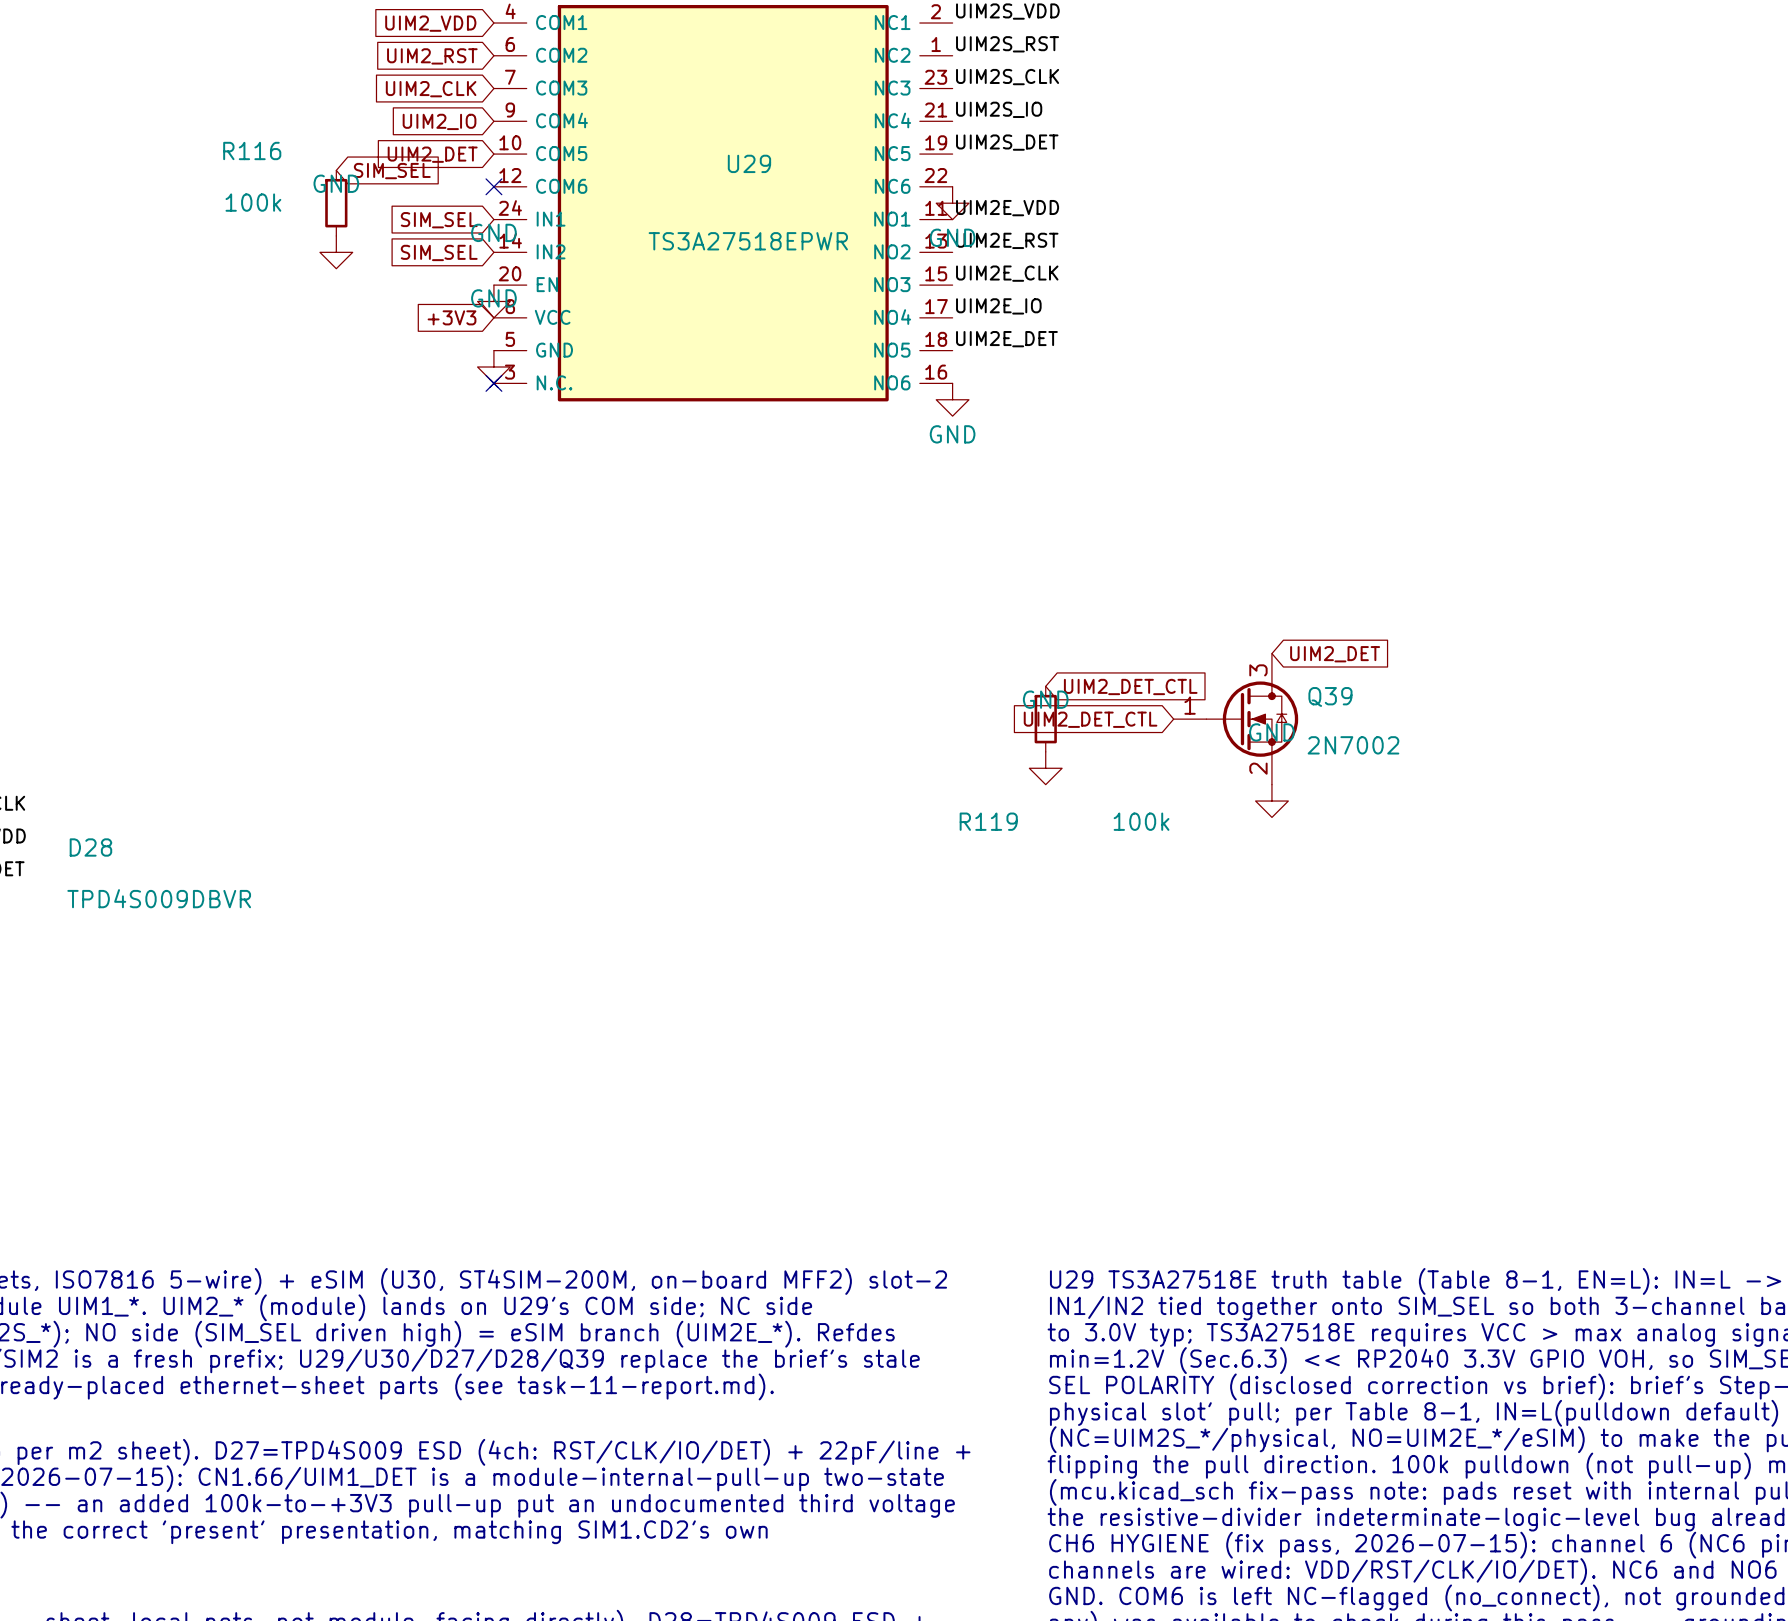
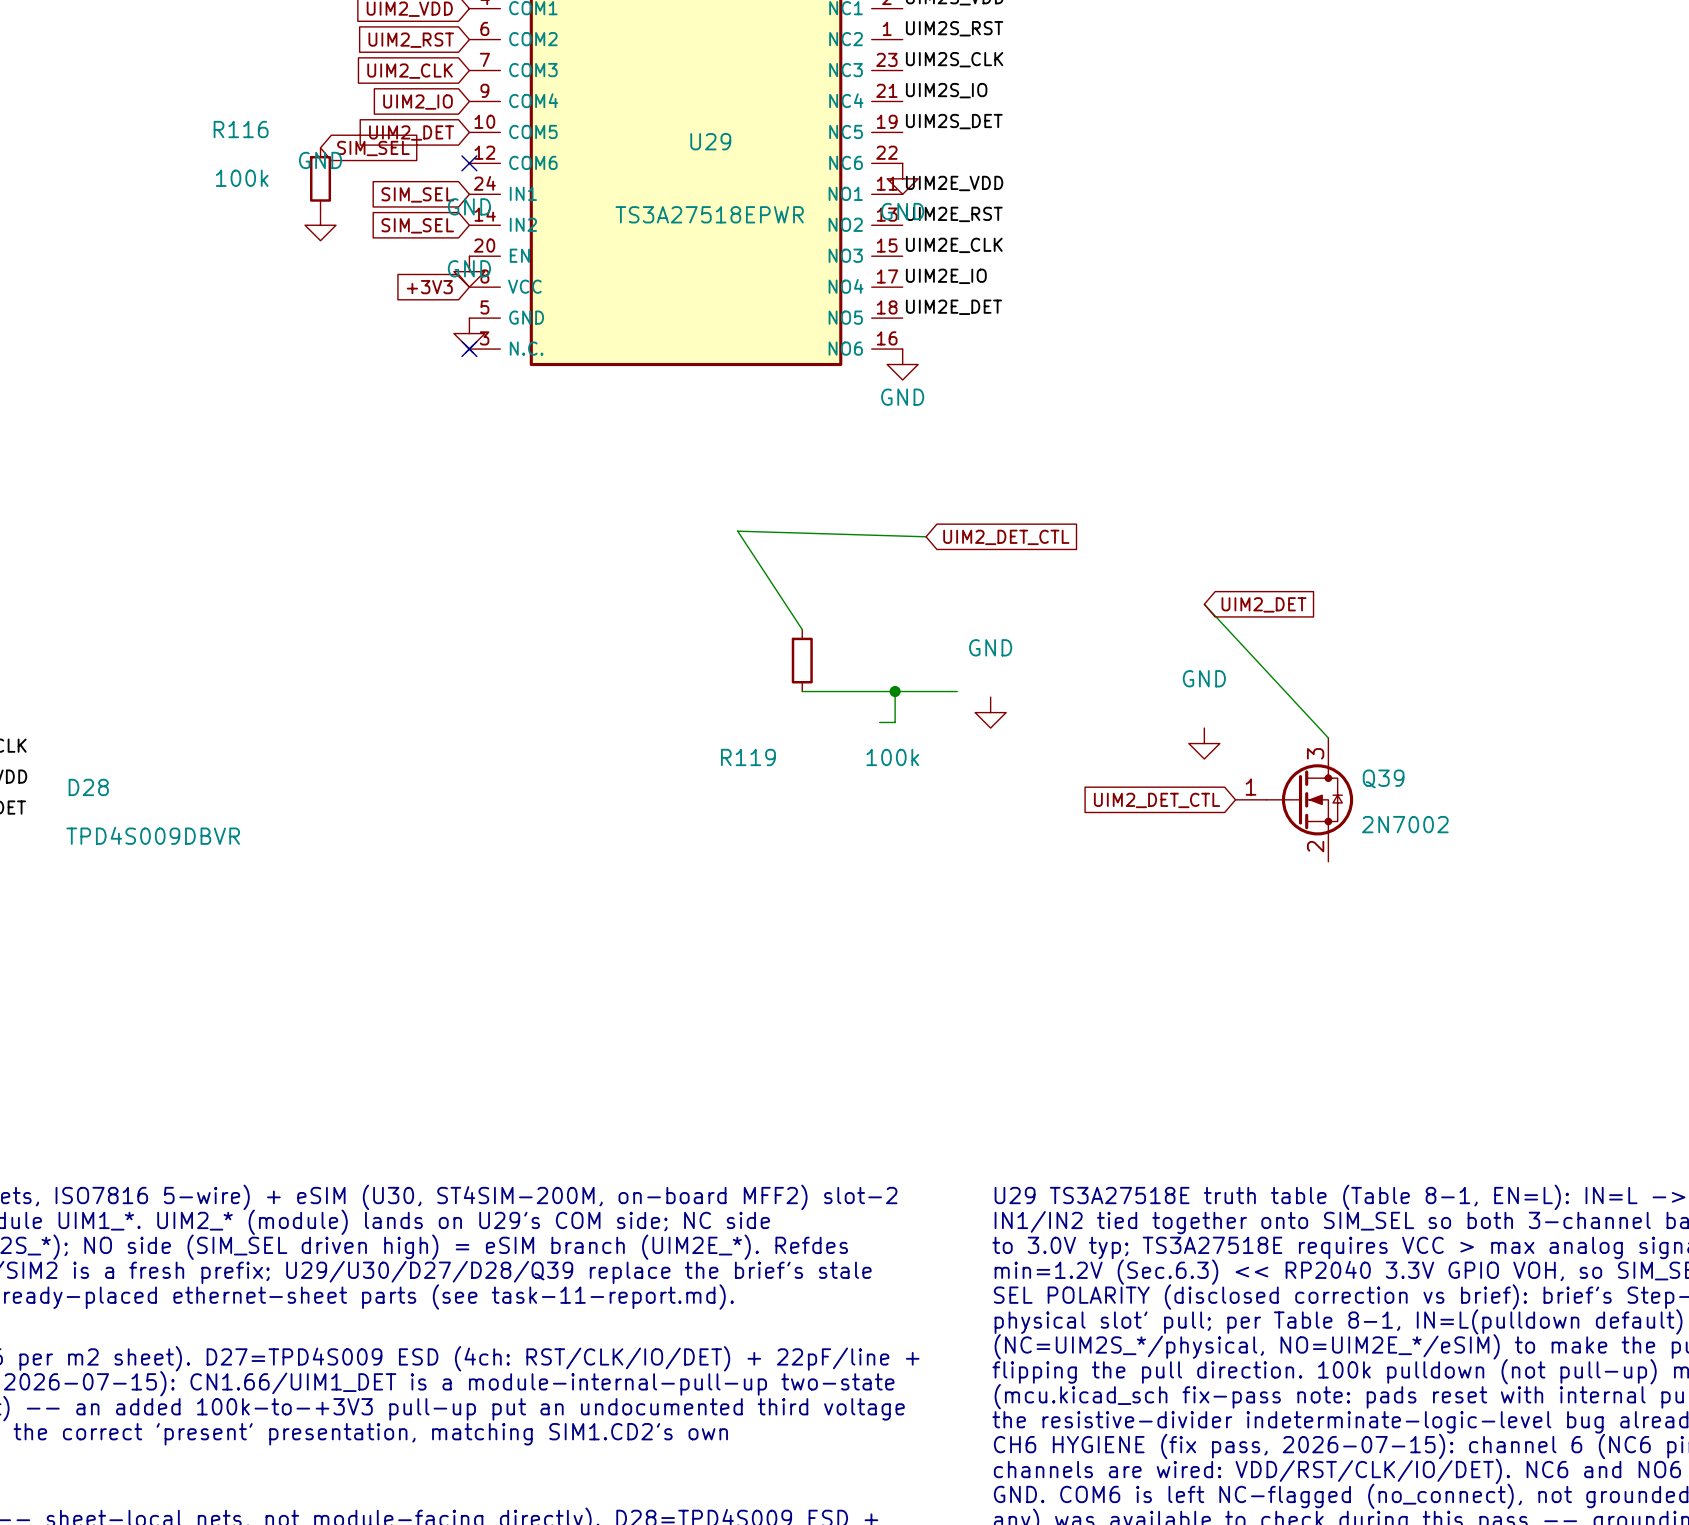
wire: none -> (926, 536) (737, 531) (802, 629)
global label: none -> UIM2_DET_CTL (1006, 537)
wire: none -> (1204, 604) (1328, 737)
global label: UIM2_DET_CTL (1130, 686) -> none
R119 position: (1045, 719) -> (802, 660)
global label: UIM2_DET_CTL (1090, 719) -> none
Q39 position: (1235, 719) -> (1294, 799)
wire: none -> (802, 691) (957, 691)
wire: none -> (895, 691) (895, 722) (879, 722)
junction: none -> (895, 691)
global label: none -> UIM2_DET_CTL (1157, 800)

